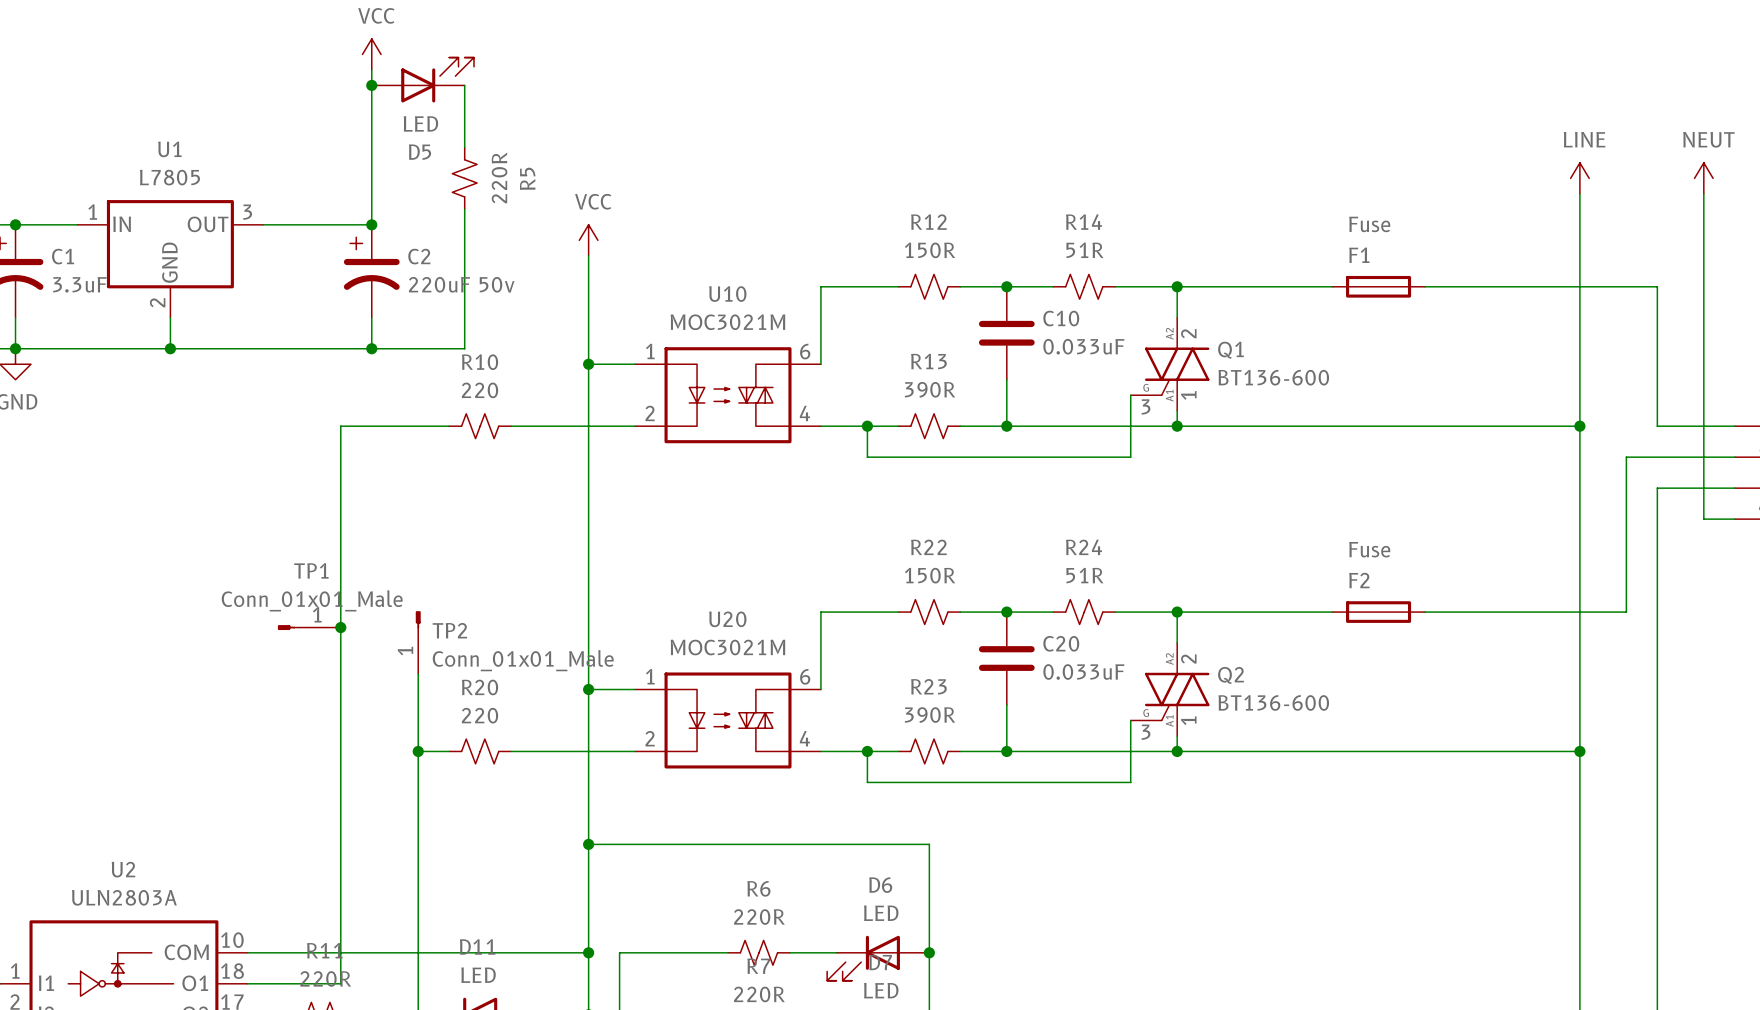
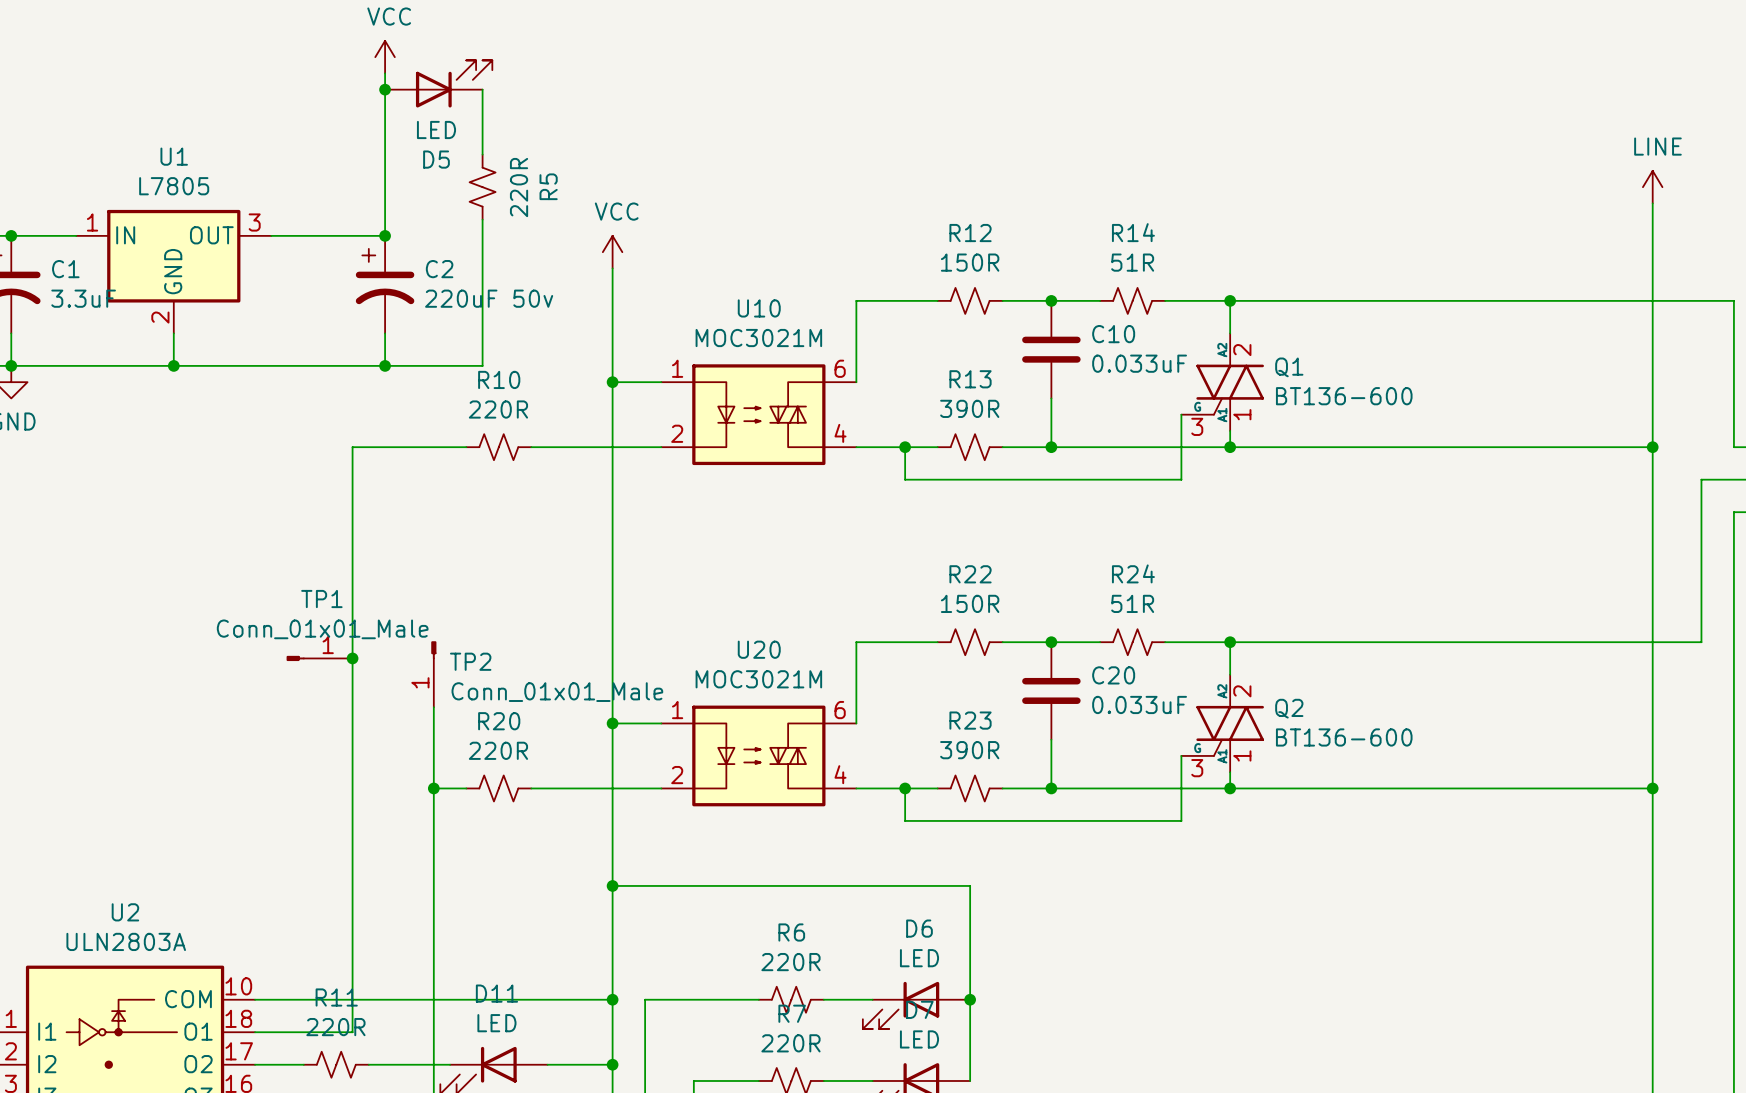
F1: Fuse (1378, 286) -> none
R10 value: 220 (479, 390) -> 220R (498, 409)
F2: Fuse (1378, 612) -> none
R20 value: 220 (479, 715) -> 220R (498, 750)

